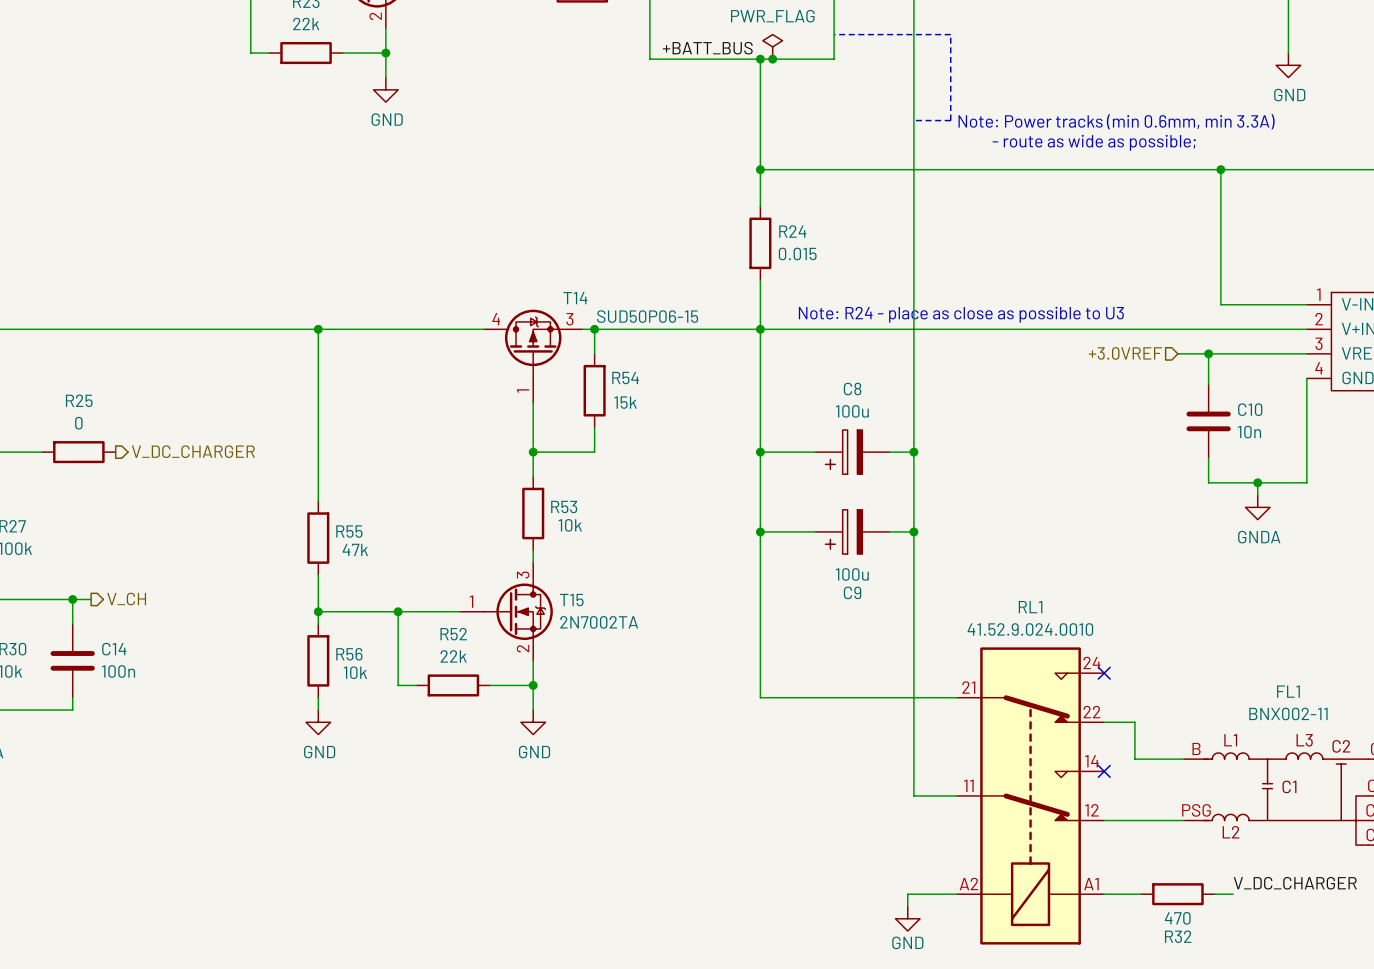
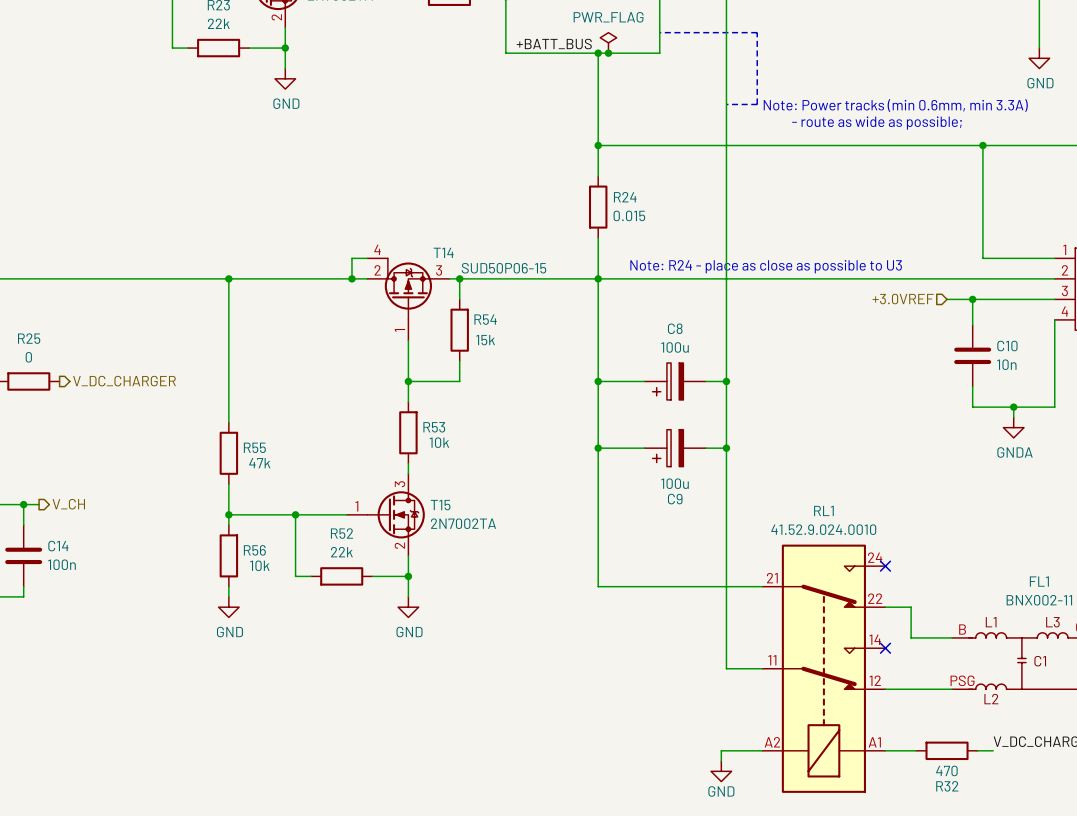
wire: none -> (367, 258) (351, 258) (351, 278)
T14 symbol: [484, 309, 583, 404] -> [367, 258, 450, 341]
junction: none -> (351, 278)

